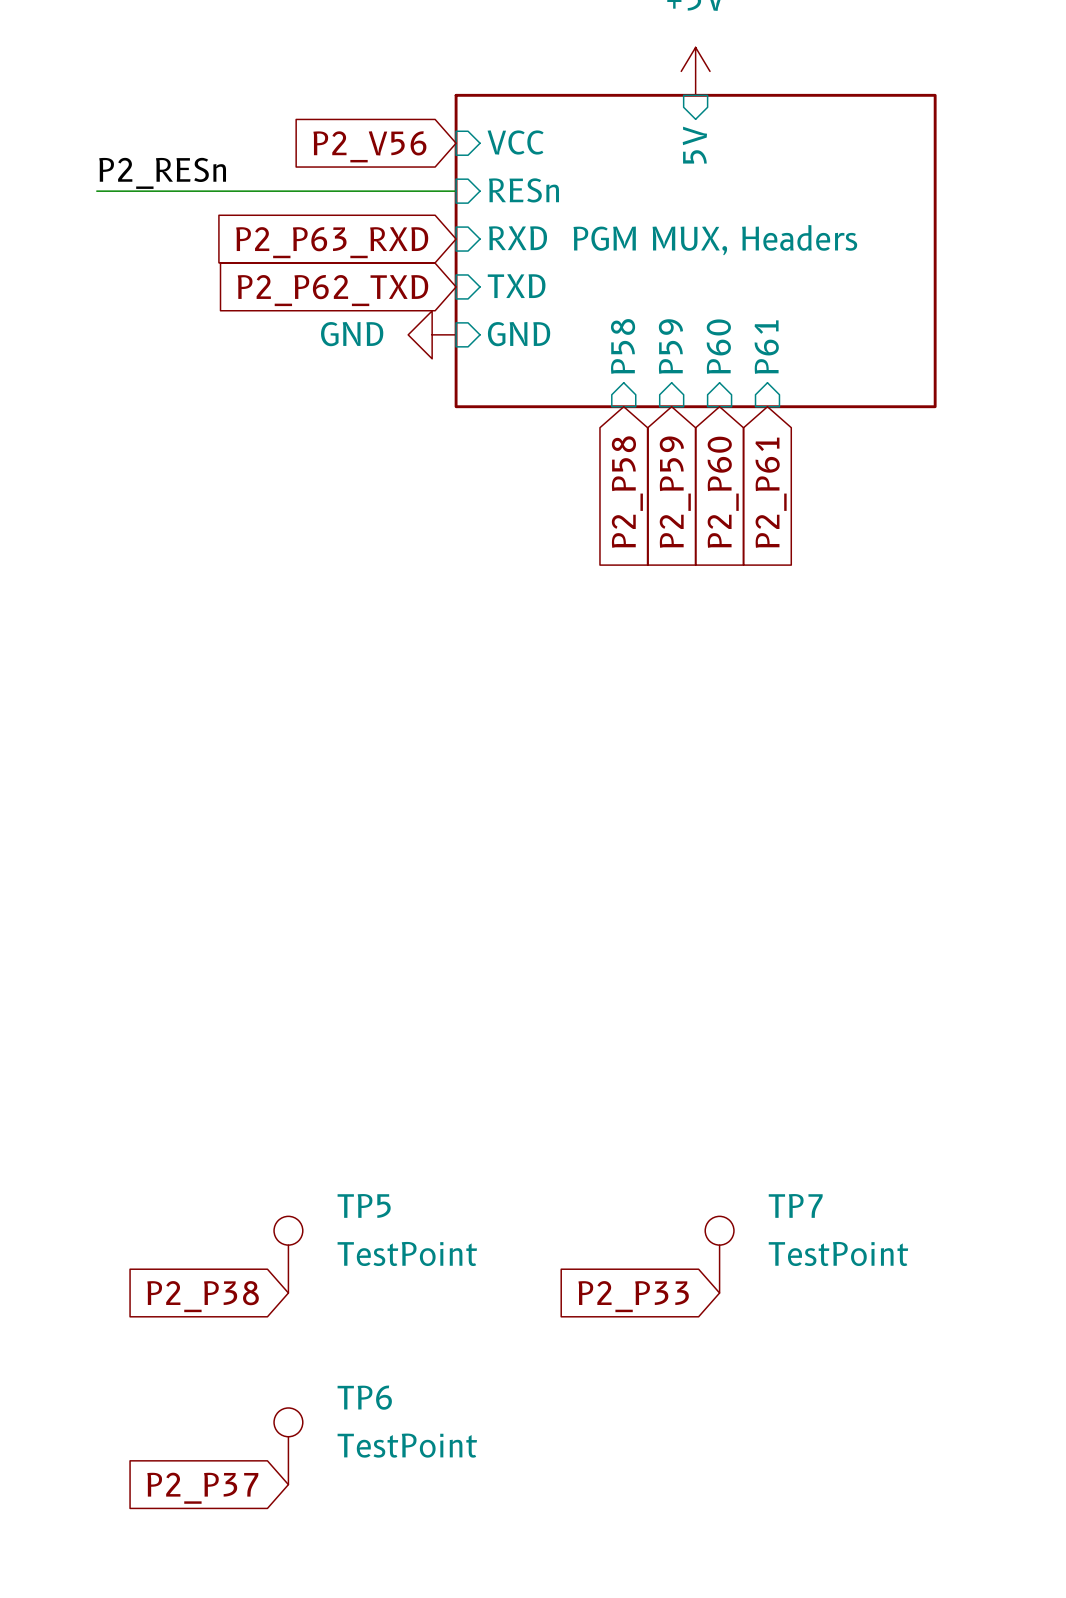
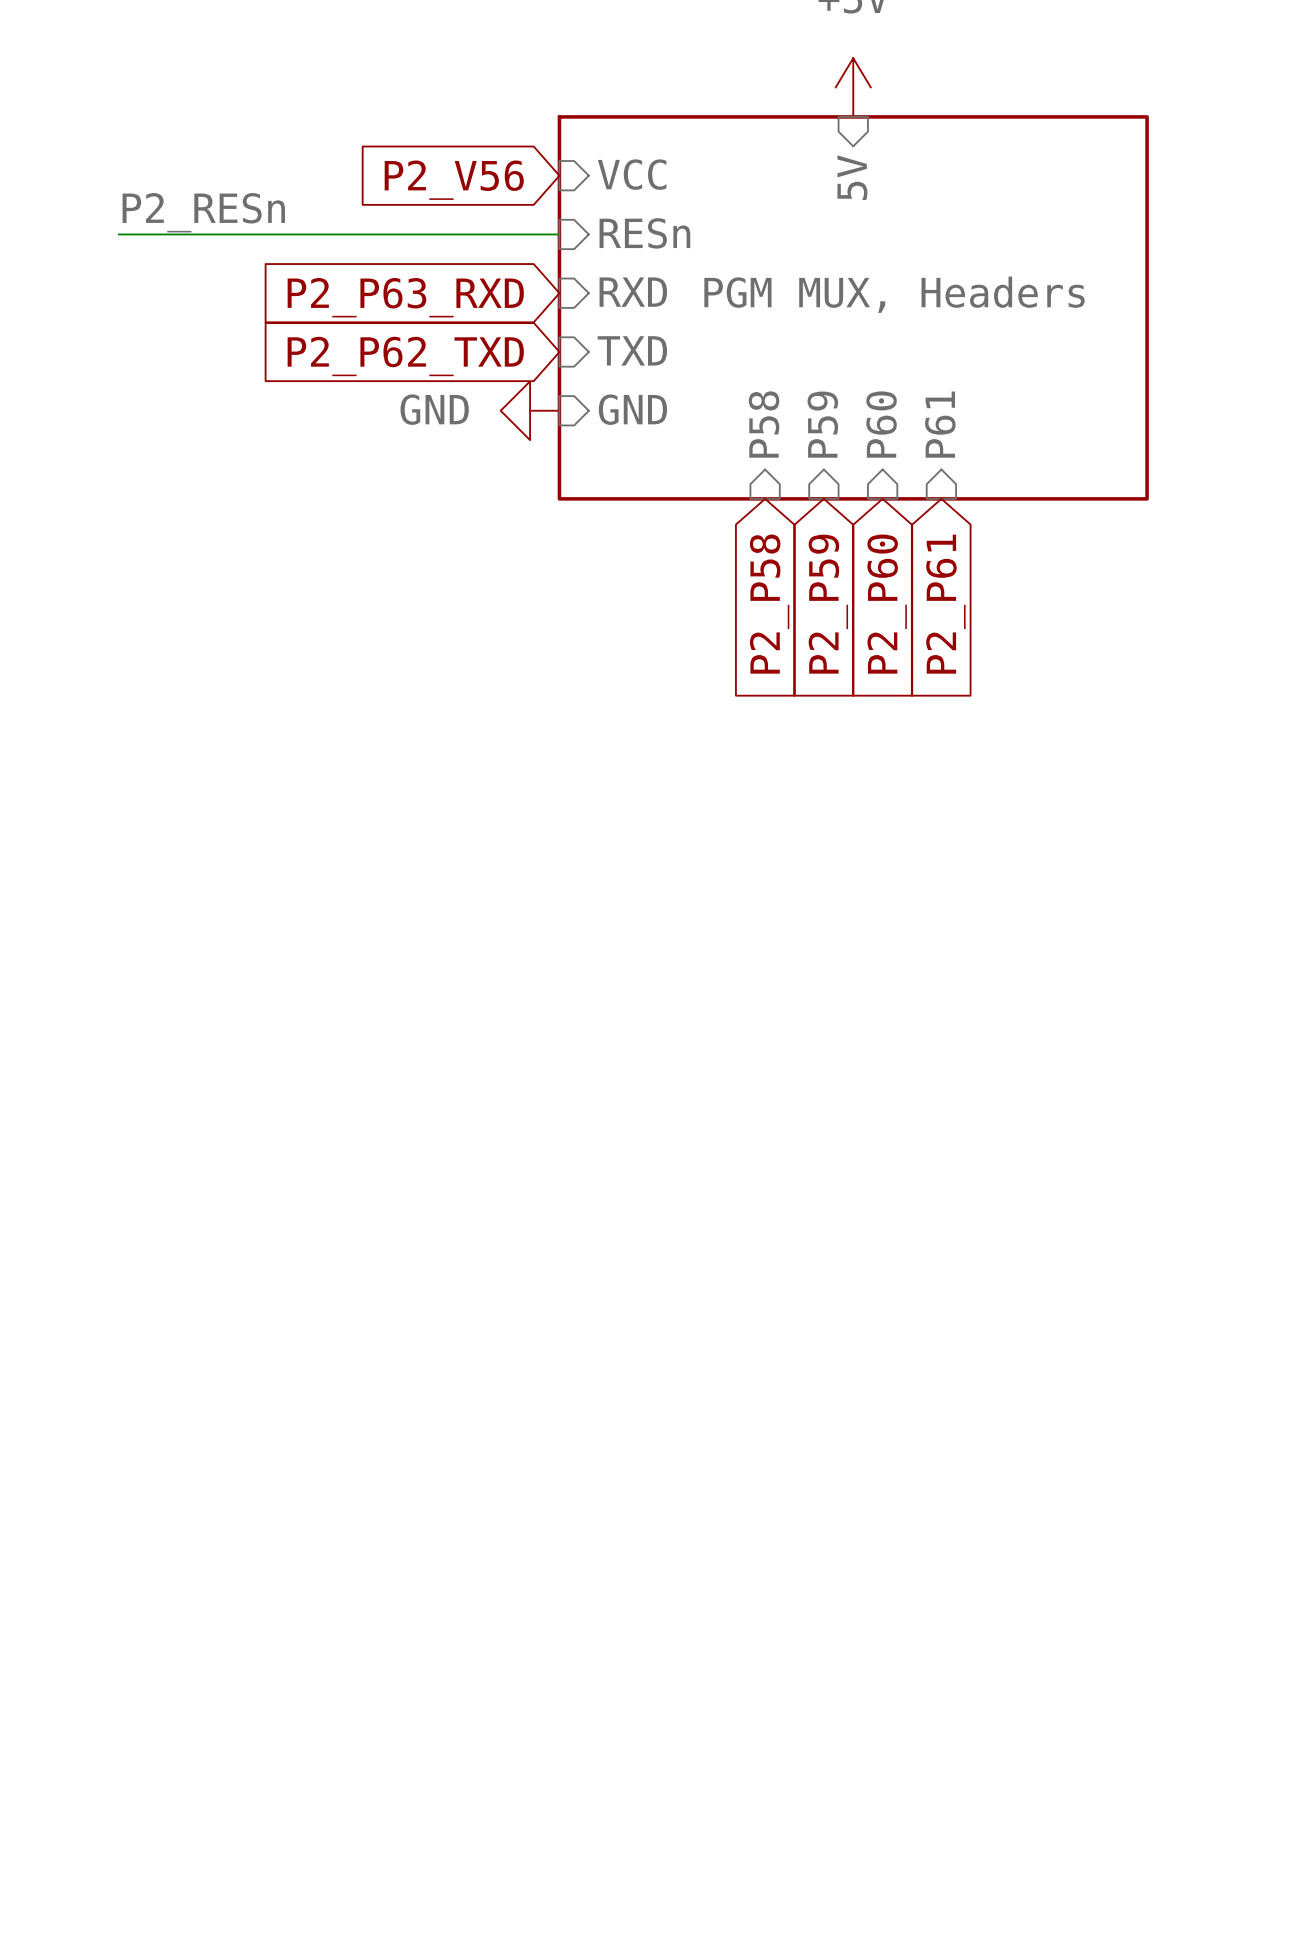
TP5: TestPoint (288, 1254) -> none
TP7: TestPoint (719, 1254) -> none
global label: P2_P38 (203, 1296) -> none
global label: P2_P33 (633, 1296) -> none
TP6: TestPoint (288, 1446) -> none
global label: P2_P37 (202, 1488) -> none

